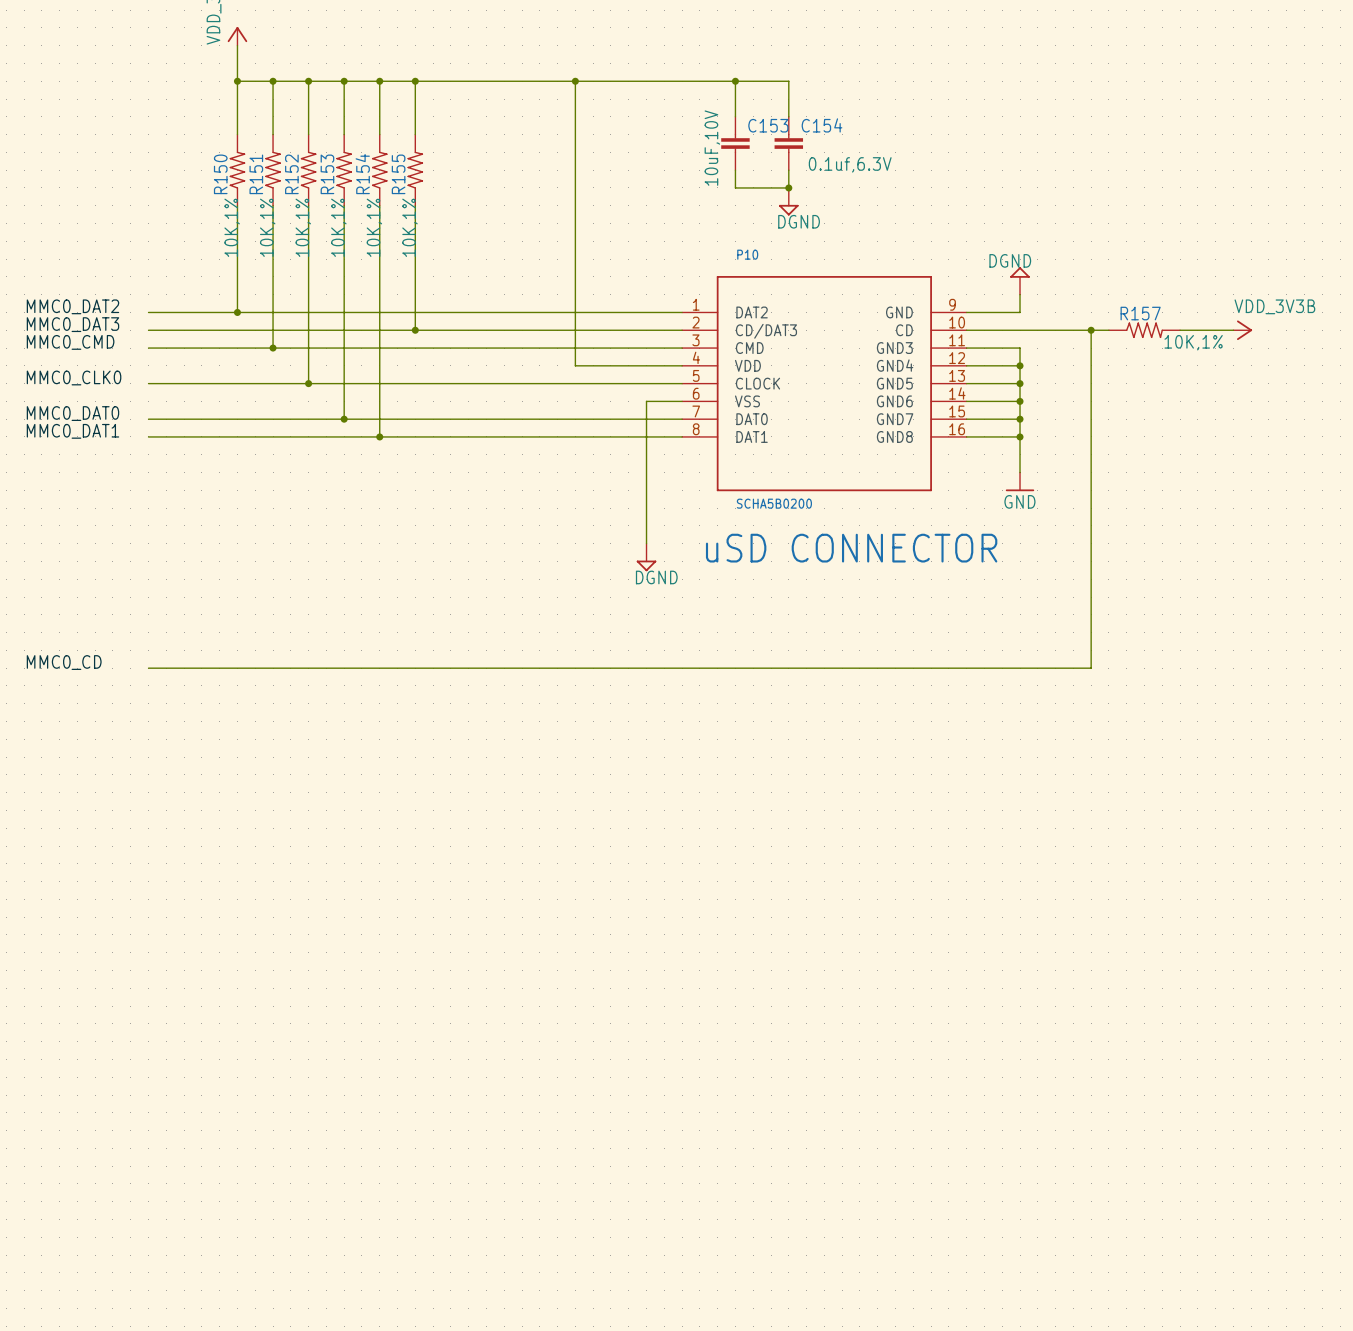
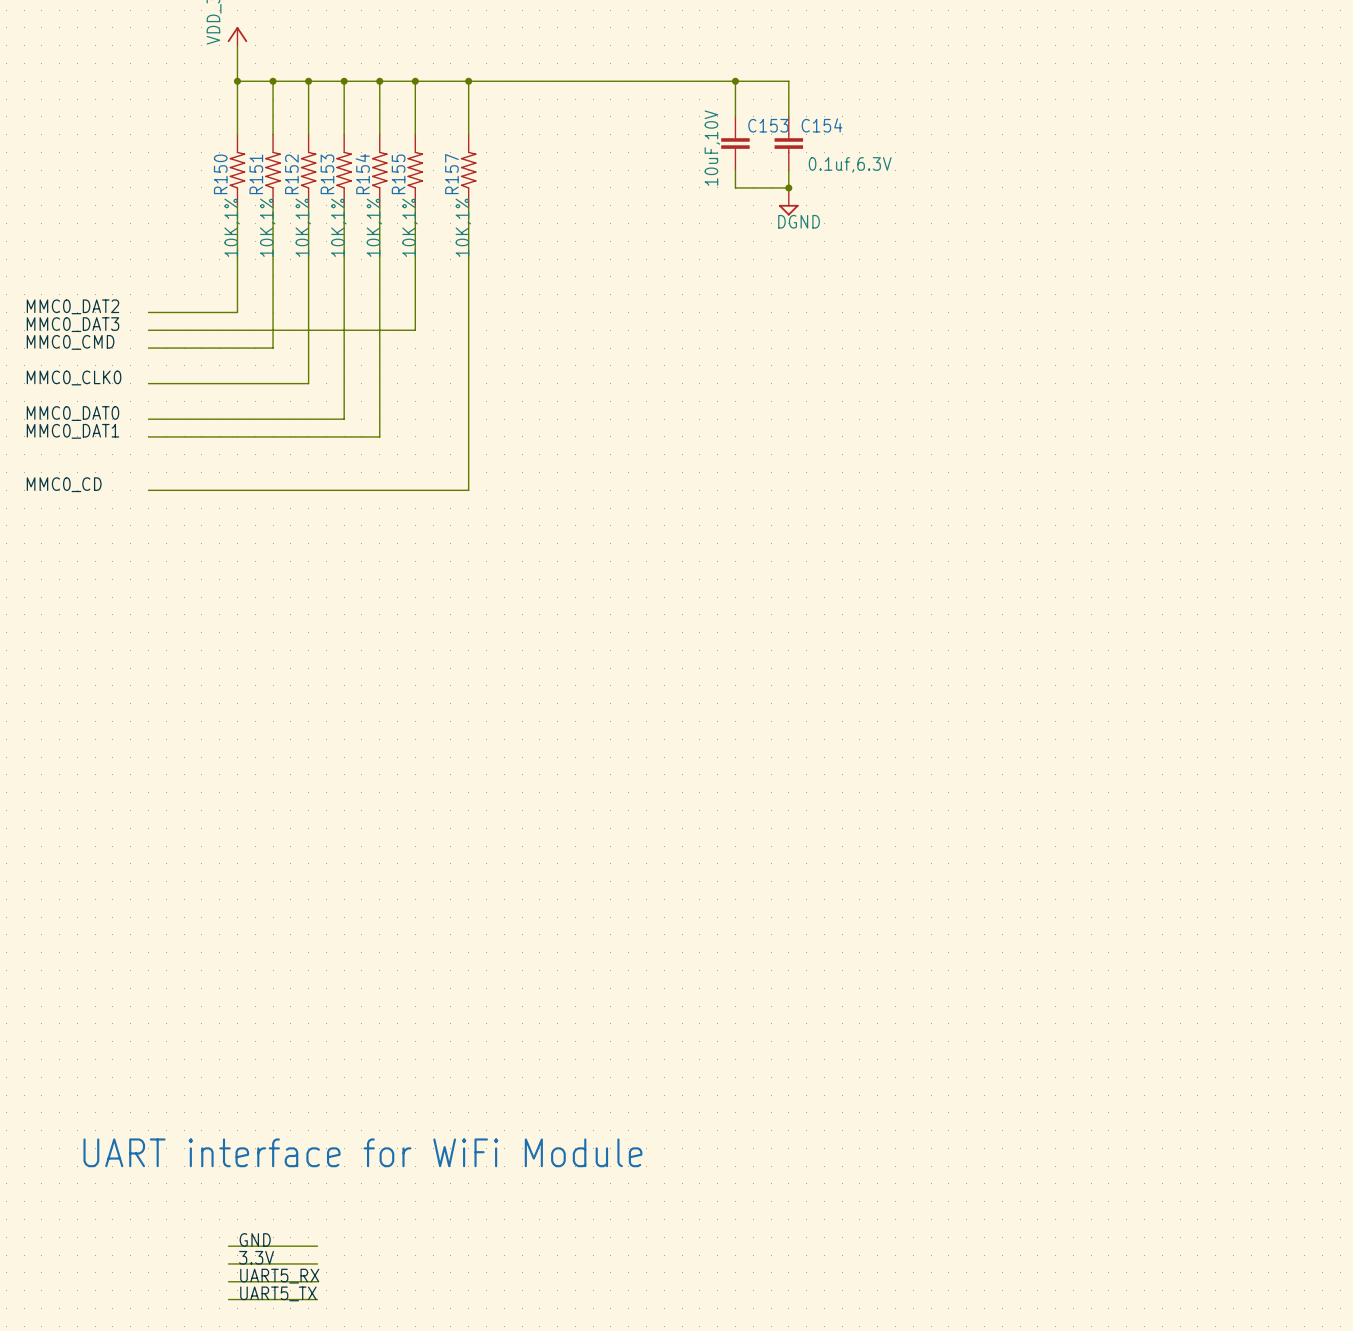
wire: none -> (468, 81) (468, 134)
junction: none -> (468, 81)
wire: (575, 81) (575, 365) (682, 365) -> none
junction: (575, 81) -> none
wire: none -> (468, 205) (468, 490) (148, 490)
text: none -> 10K,1% (463, 227)
power symbol: DGND (1020, 280) -> none
wire: (1020, 294) (1020, 312) (966, 312) -> none
wire: (237, 312) (682, 312) -> none
junction: (237, 312) -> none
wire: (415, 330) (682, 330) -> none
junction: (415, 330) -> none
wire: (966, 330) (1108, 330) -> none
wire: (1091, 330) (1091, 668) (148, 668) -> none
junction: (1091, 330) -> none
R157 rotation: 0° (1144, 330) -> 90° counterclockwise (468, 170)
R157 position: (1144, 330) -> (468, 170)
wire: (1180, 330) (1233, 330) -> none
power symbol: VDD_3V3B (1242, 330) -> none
text: 10K,1% (1193, 342) -> none
wire: (273, 348) (682, 348) -> none
junction: (273, 348) -> none
wire: (966, 348) (1020, 348) (1020, 472) -> none
wire: (966, 365) (1020, 365) -> none
junction: (1020, 365) -> none
wire: (308, 383) (682, 383) -> none
junction: (308, 383) -> none
part: (824, 383) -> none
wire: (966, 383) (1020, 383) -> none
junction: (1020, 383) -> none
wire: (682, 401) (646, 401) (646, 543) -> none
wire: (966, 401) (1020, 401) -> none
junction: (1020, 401) -> none
wire: (344, 419) (682, 419) -> none
junction: (344, 419) -> none
wire: (966, 419) (1020, 419) -> none
junction: (1020, 419) -> none
wire: (379, 436) (682, 436) -> none
junction: (379, 436) -> none
wire: (966, 436) (1020, 436) -> none
junction: (1020, 436) -> none
power symbol: GND (1020, 481) -> none
label: none -> MMC0_CD (64, 484)
text: uSD CONNECTOR (851, 548) -> none
power symbol: DGND (646, 557) -> none
label: MMC0_CD (64, 662) -> none
text: none -> UART interface for WiFi Module (362, 1152)
label: none -> GND (255, 1239)
wire: none -> (228, 1246) (317, 1246)
label: none -> 3.3V (256, 1257)
wire: none -> (228, 1263) (317, 1263)
label: none -> UART5_RX (279, 1276)
wire: none -> (228, 1281) (317, 1281)
label: none -> UART5_TX (278, 1293)
wire: none -> (228, 1299) (317, 1299)

